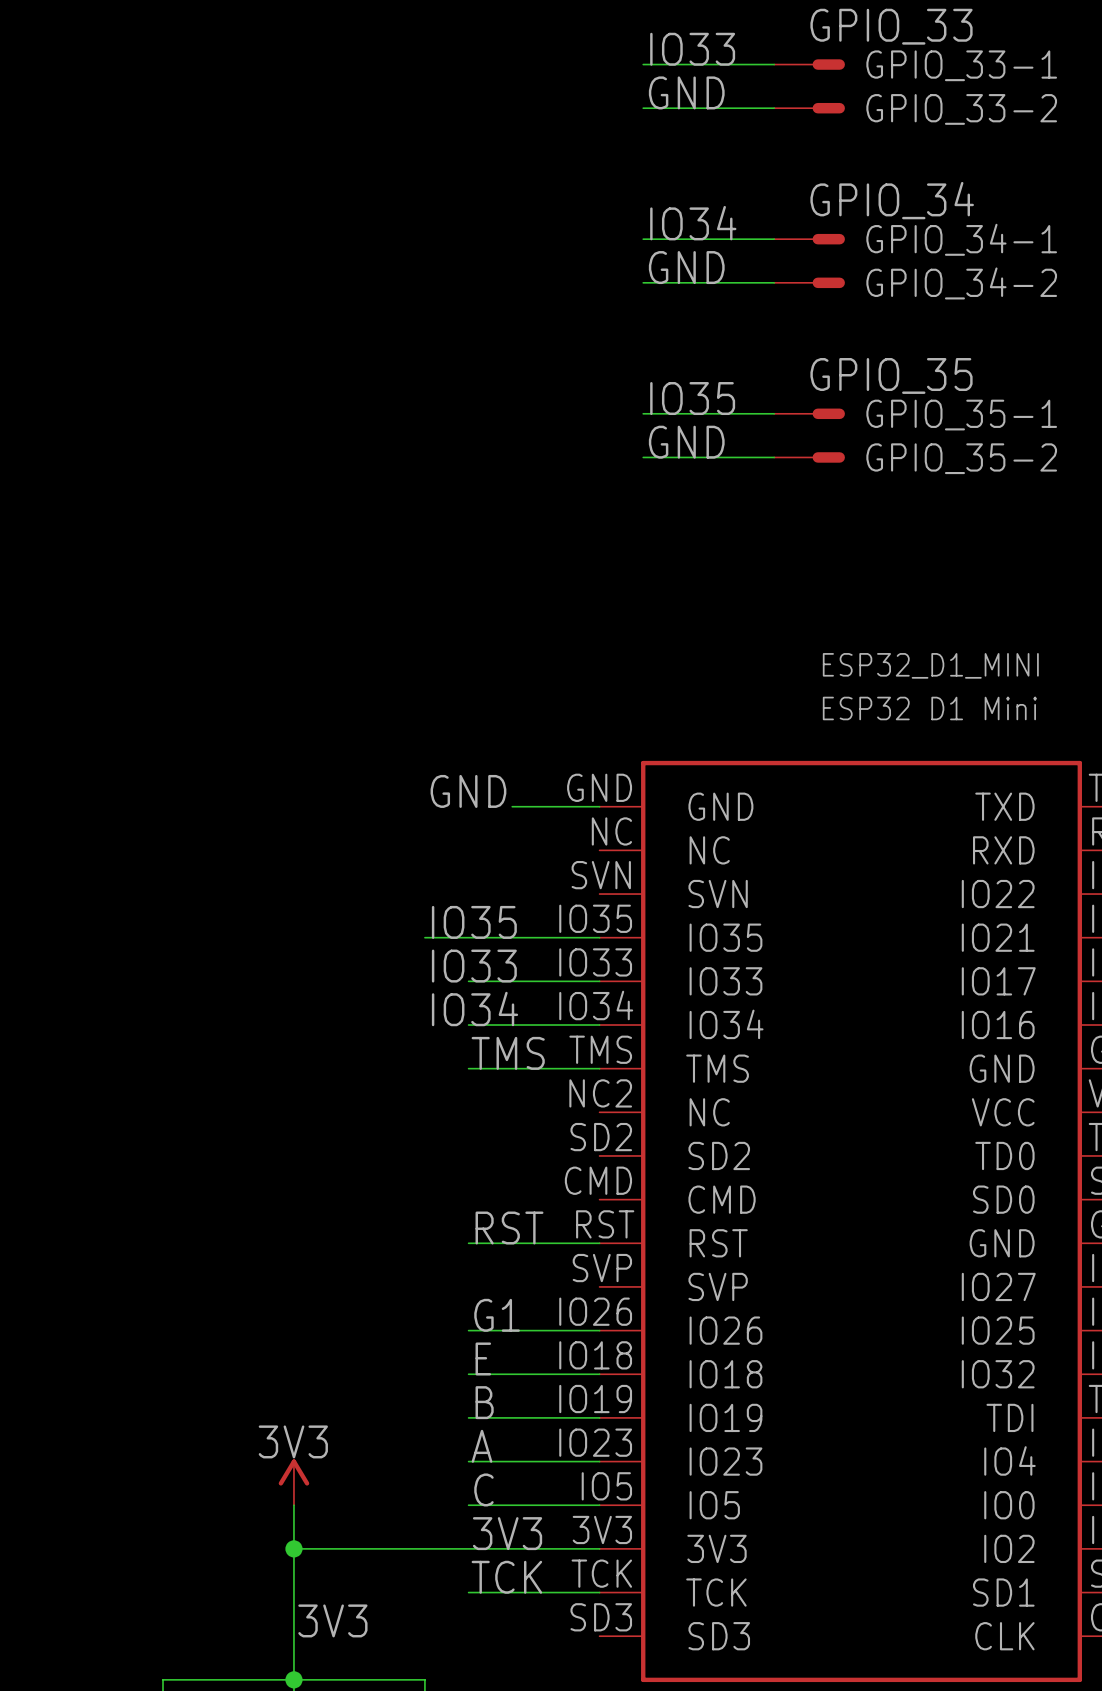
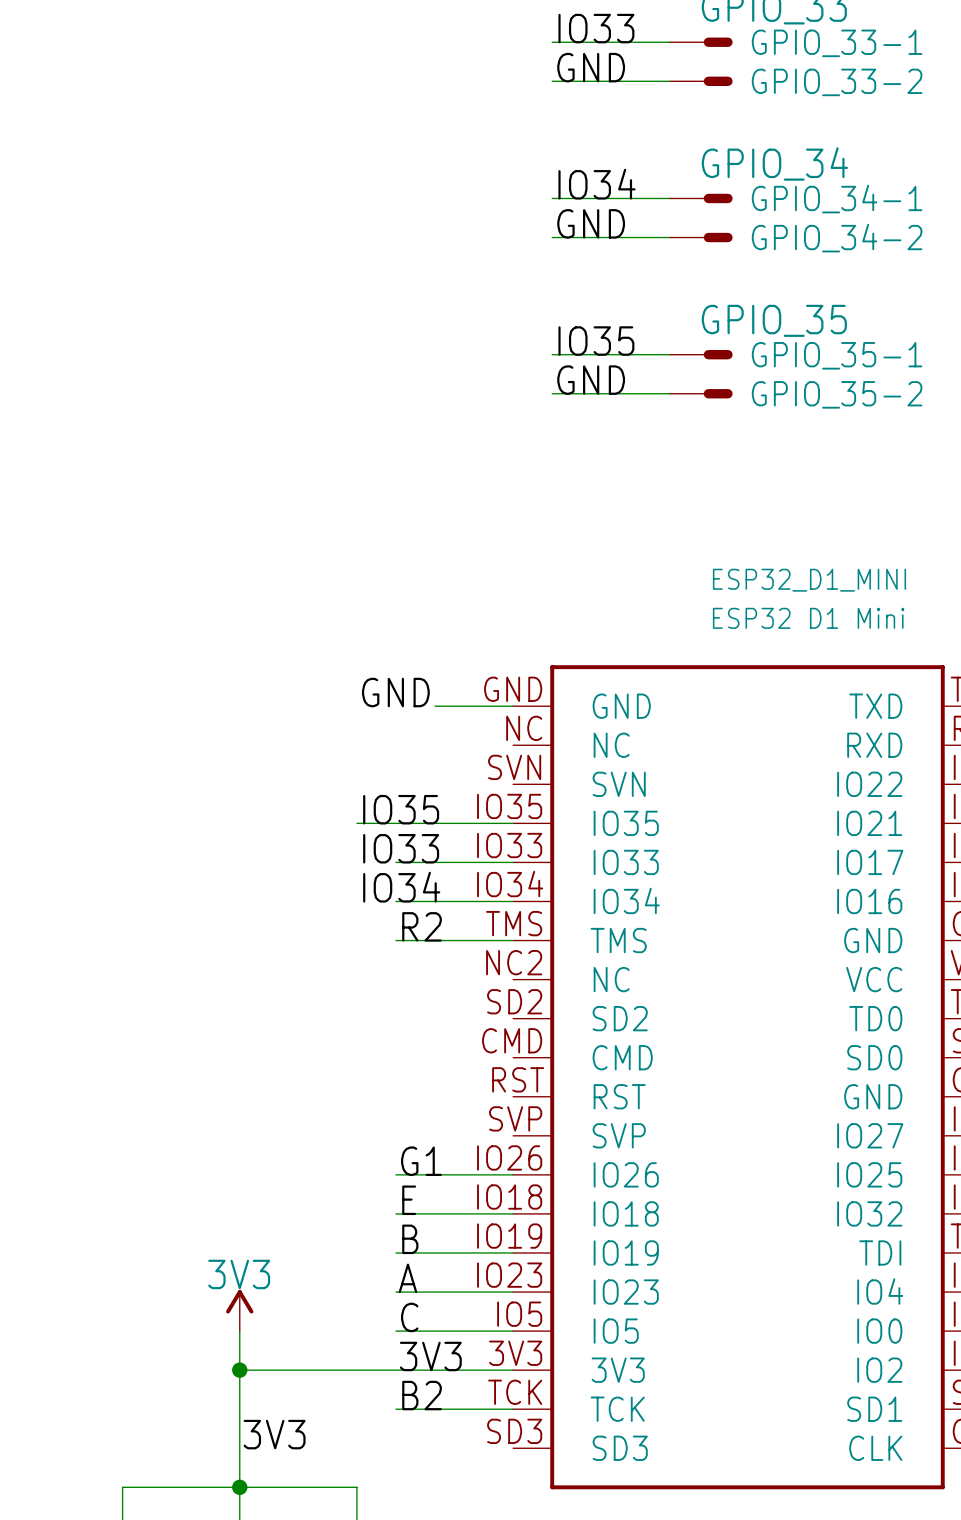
label: TMS (508, 1053) -> R2 (422, 926)
label: RST (509, 1228) -> none
wire: (468, 1243) (599, 1243) -> none
label: TCK (506, 1577) -> B2 (422, 1395)

